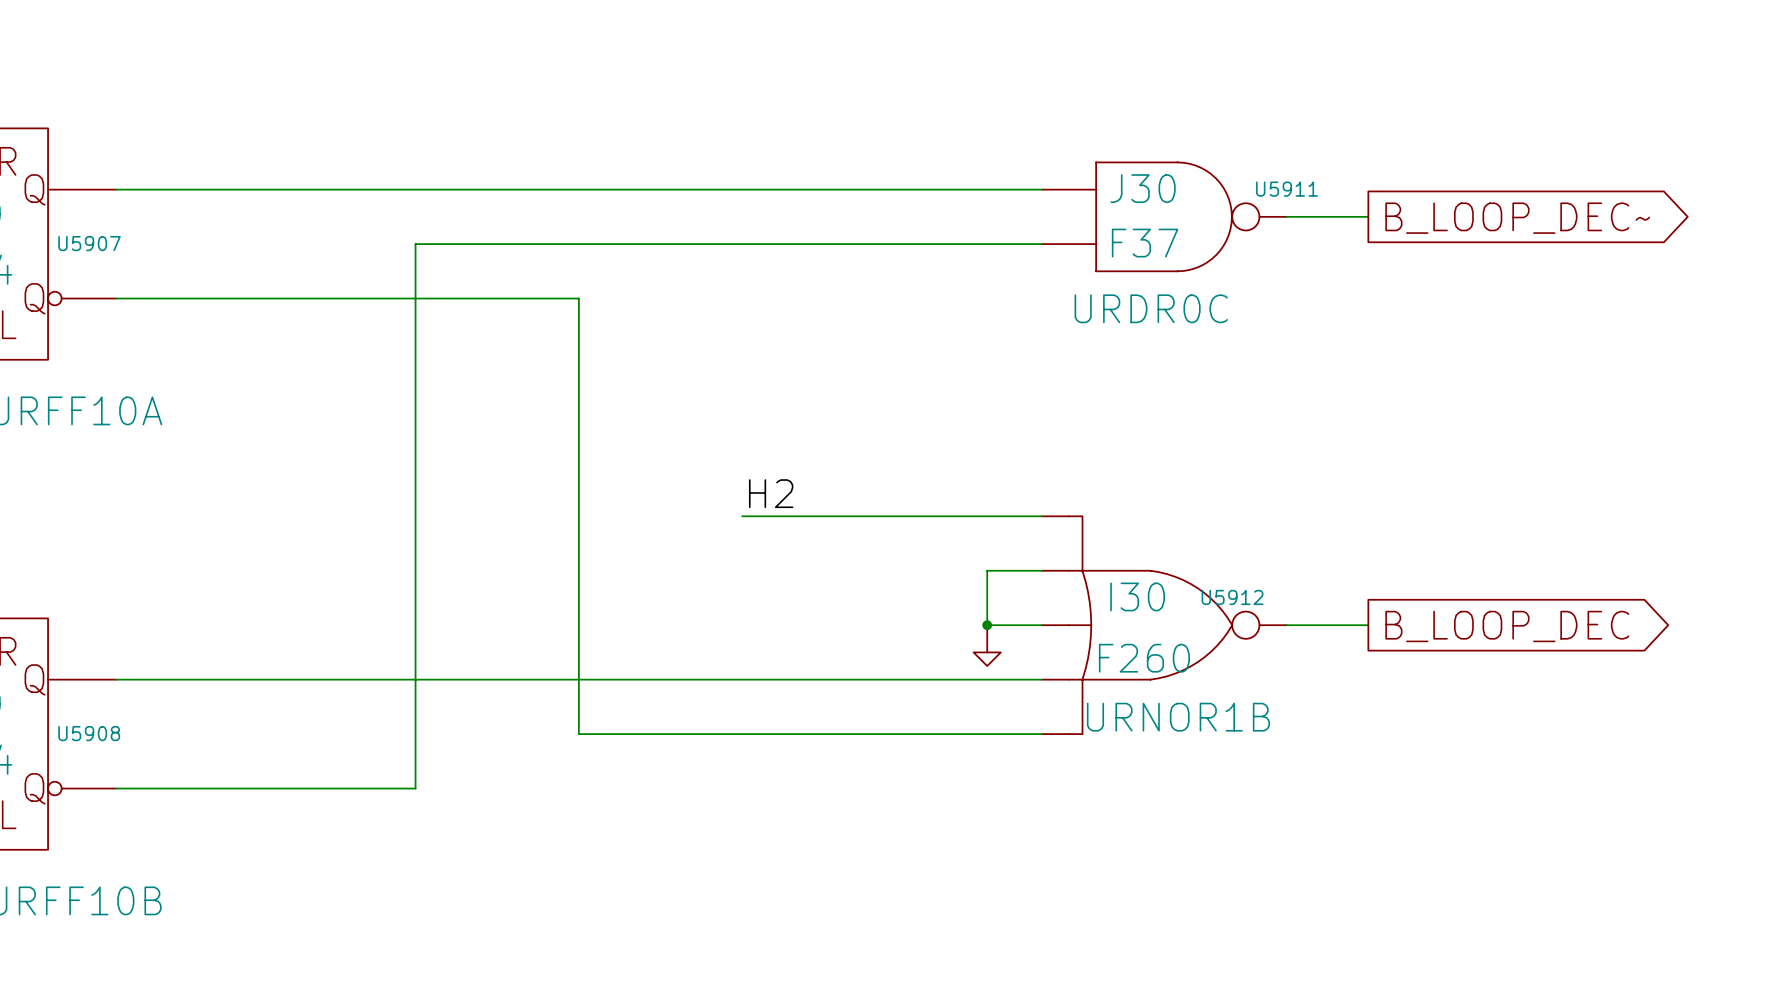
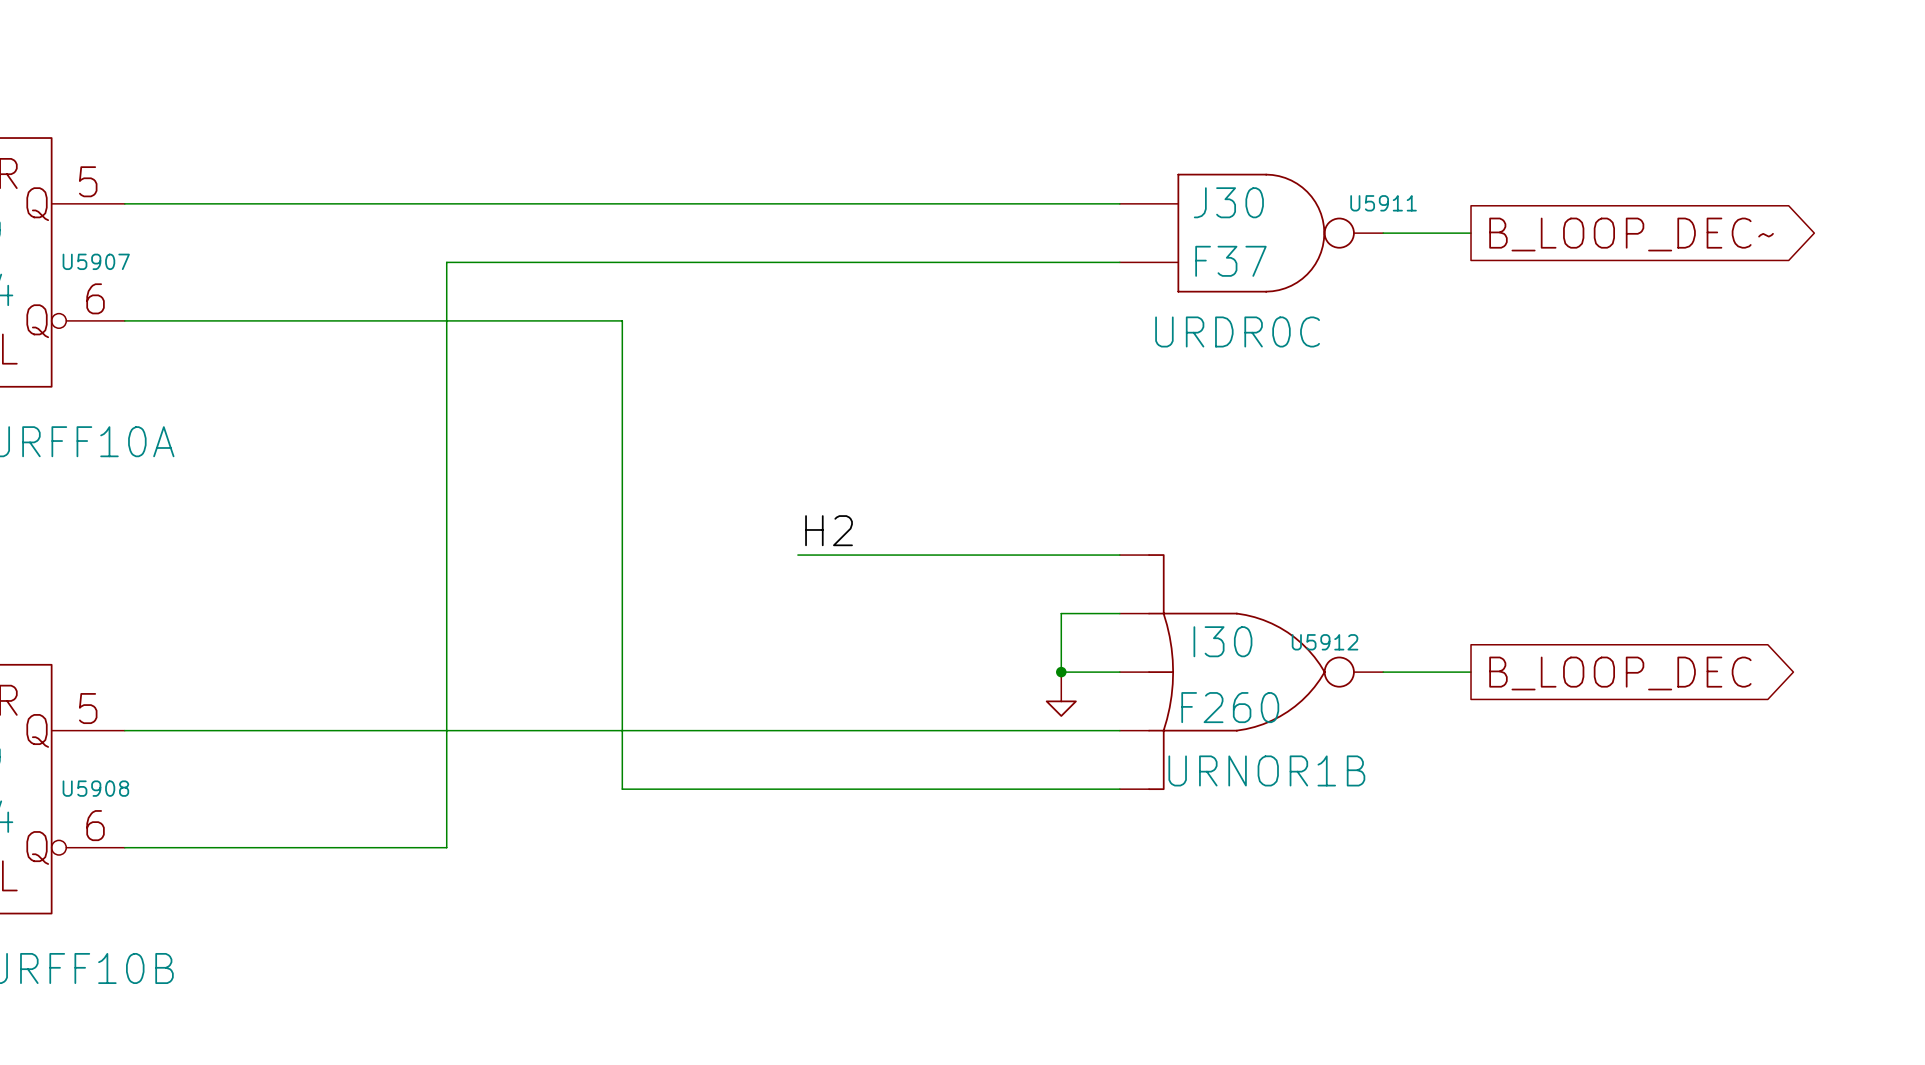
U5907 pin number: none -> 5 (88, 181)
U5907 pin number: none -> 6 (95, 298)
U5908 pin number: none -> 5 (88, 708)
U5908 pin number: none -> 6 (95, 825)

